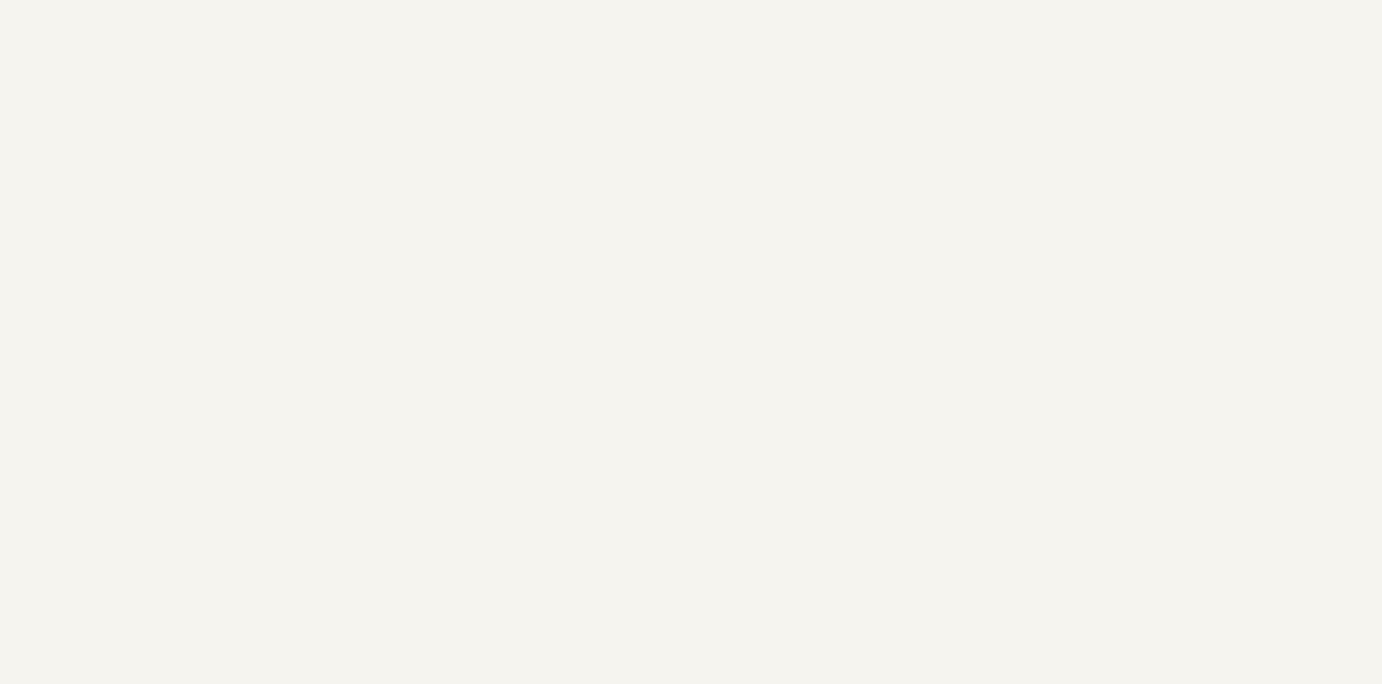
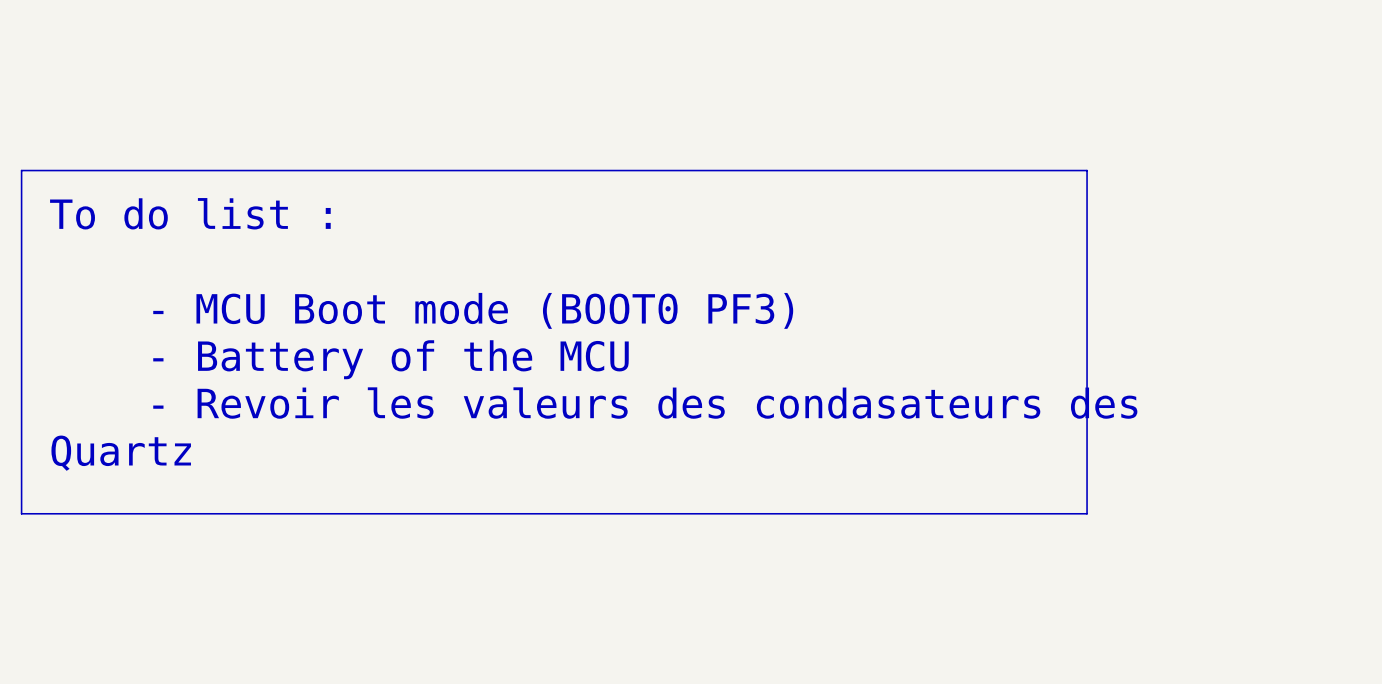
line: none -> (21, 170) (1087, 170) (1087, 513) (21, 513) (21, 170)
text: none -> To do list : (190, 213)
text: none -> - MCU Boot mode (BOOT0 PF3) (473, 310)
text: none -> - Battery of the MCU (390, 359)
text: none -> - Revoir les valeurs des condasateurs des (645, 403)
text: none -> Quartz (121, 453)

